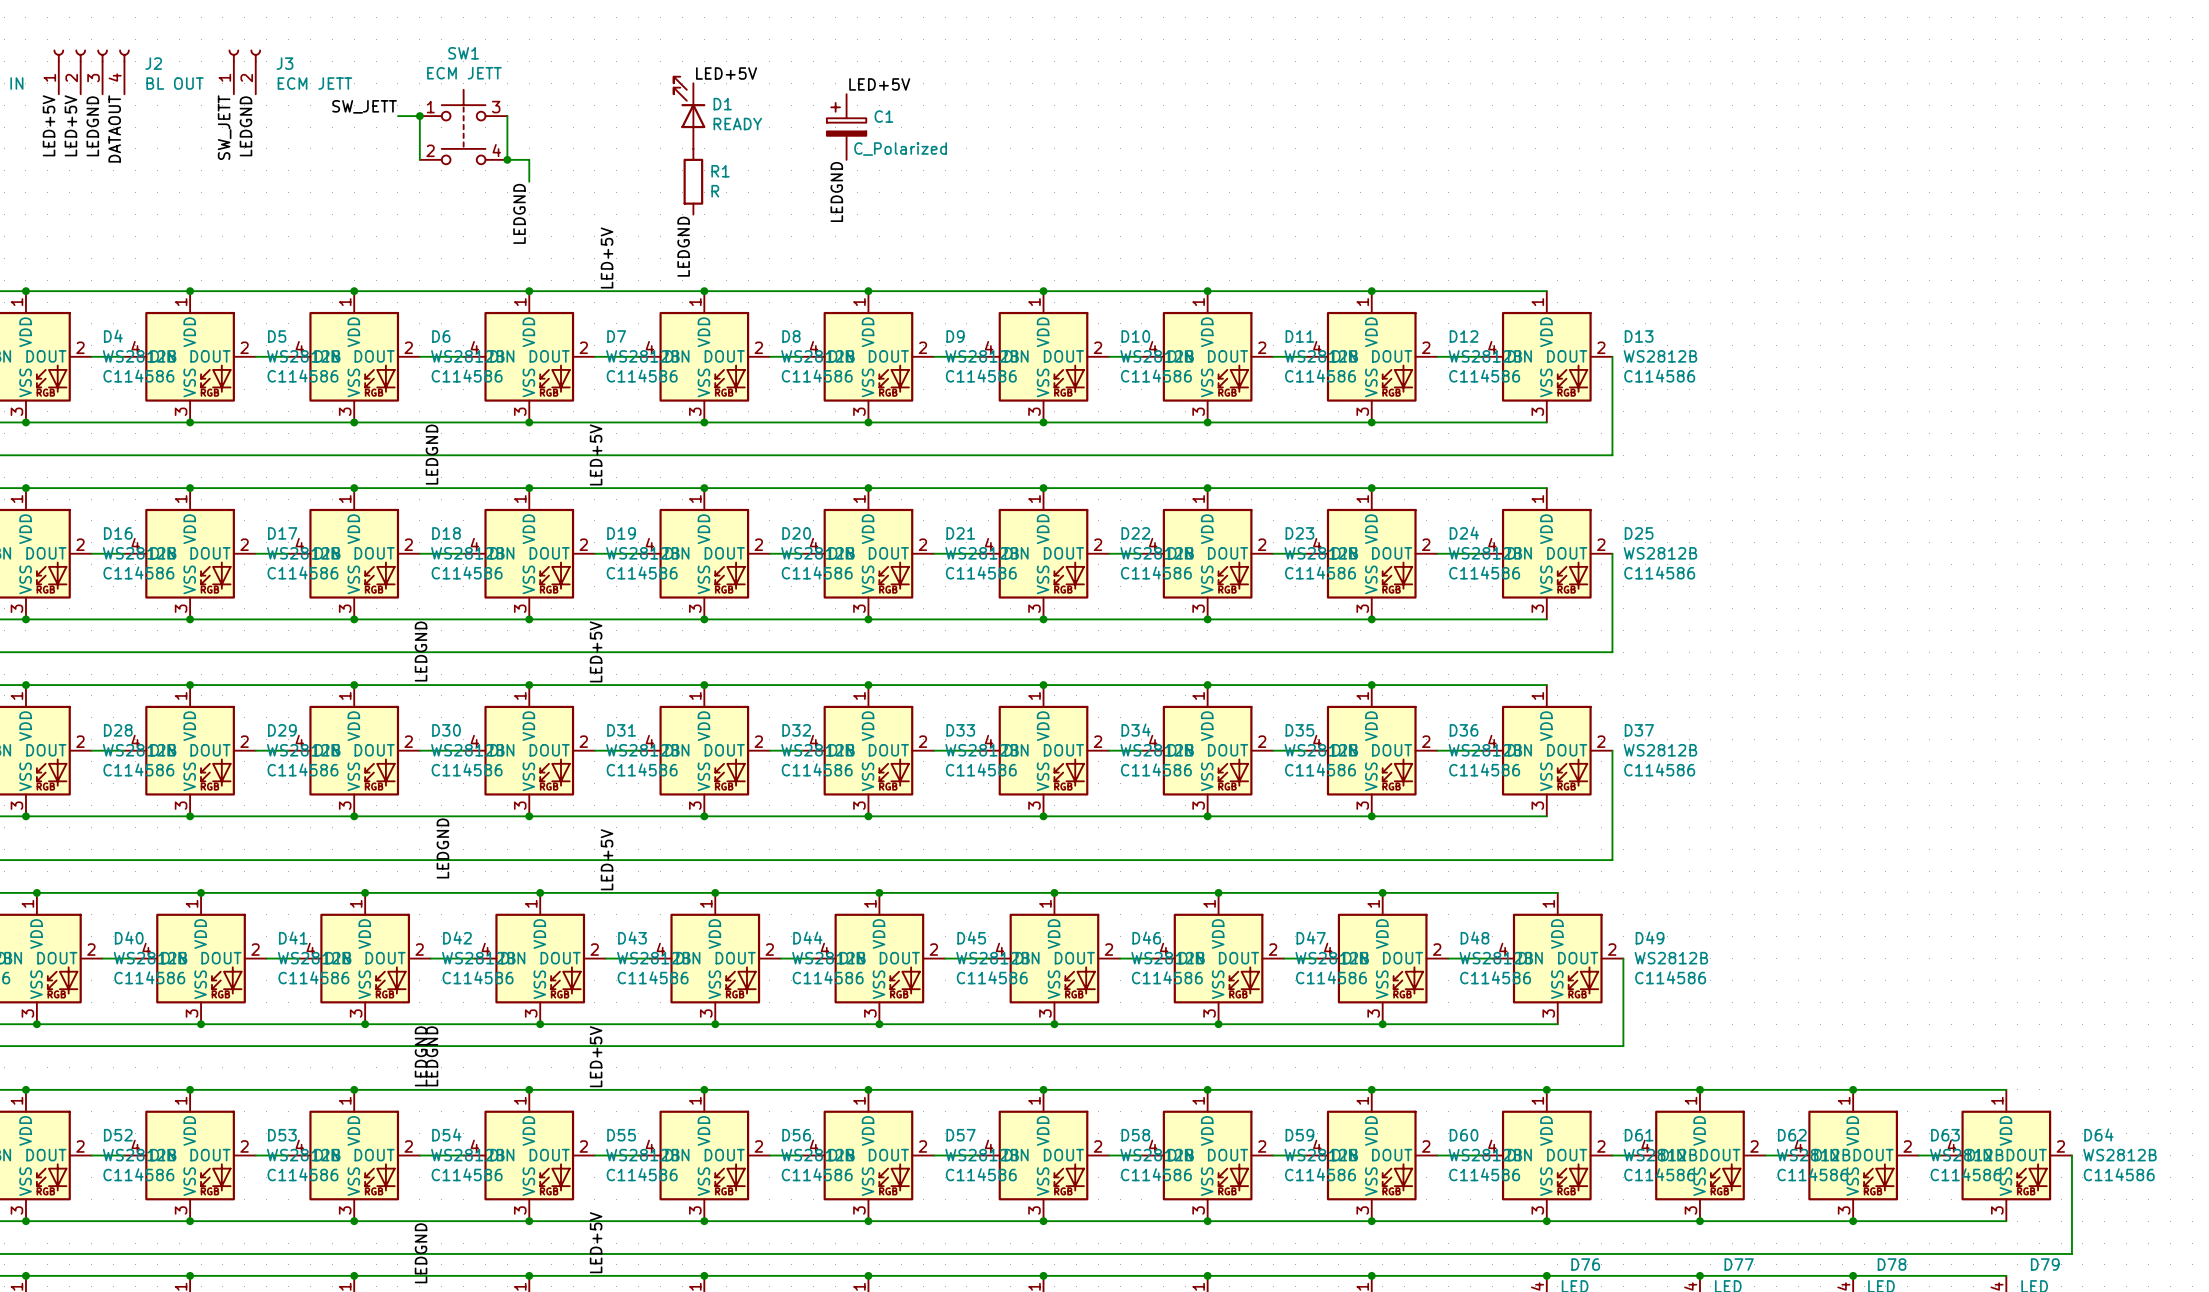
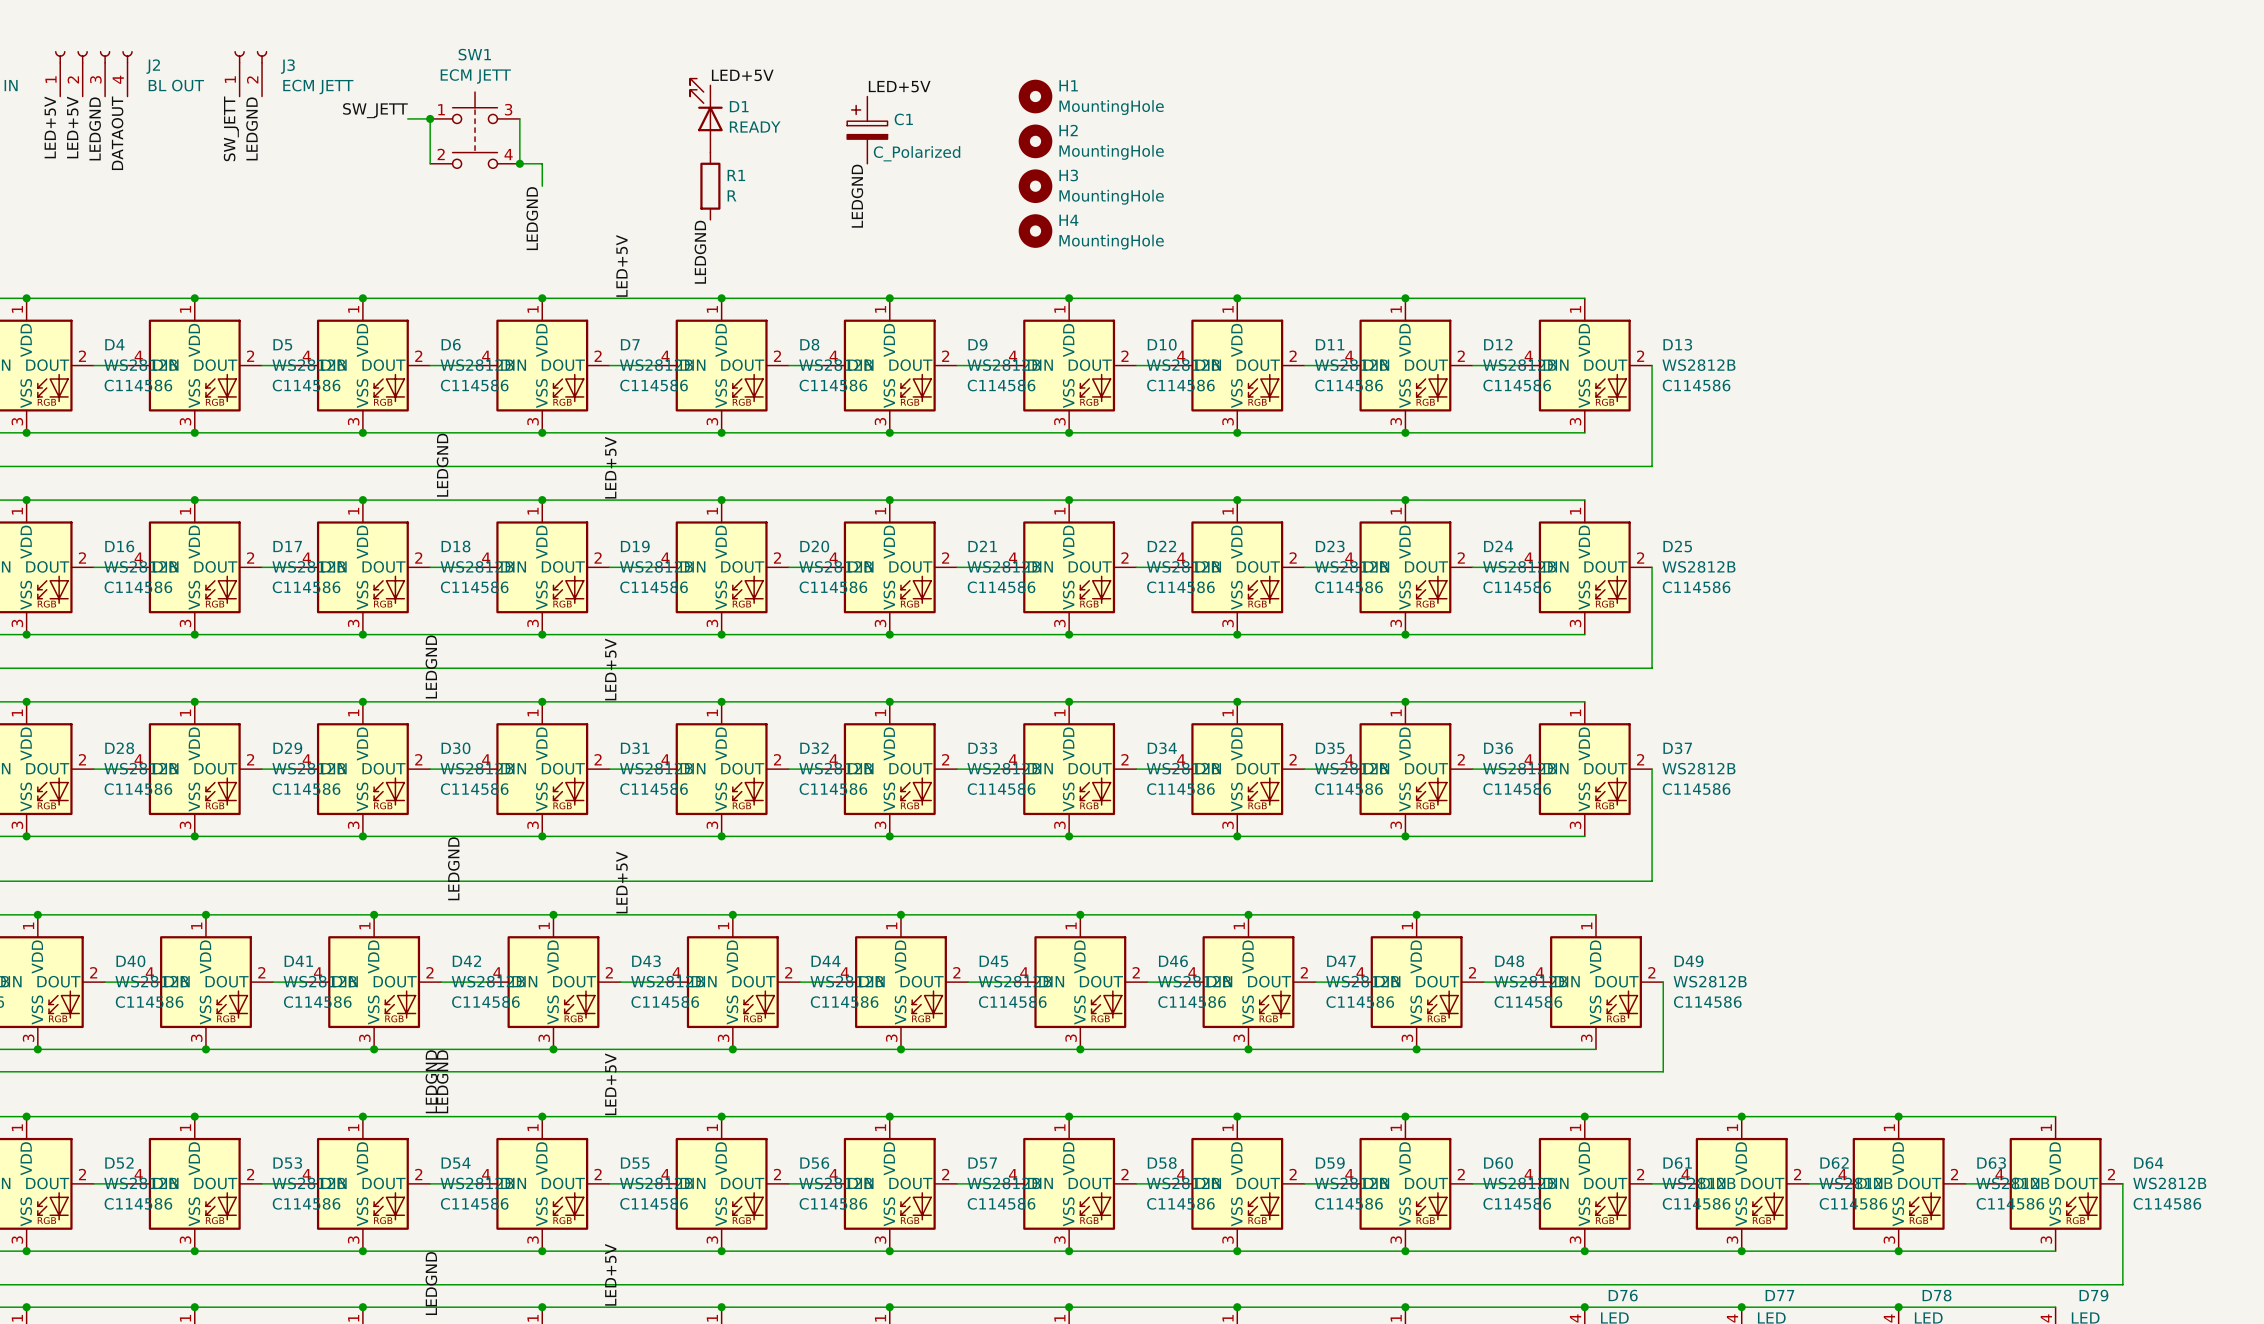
H1: none -> MountingHole (1035, 96)
H2: none -> MountingHole (1035, 141)
H3: none -> MountingHole (1035, 186)
H4: none -> MountingHole (1035, 231)

